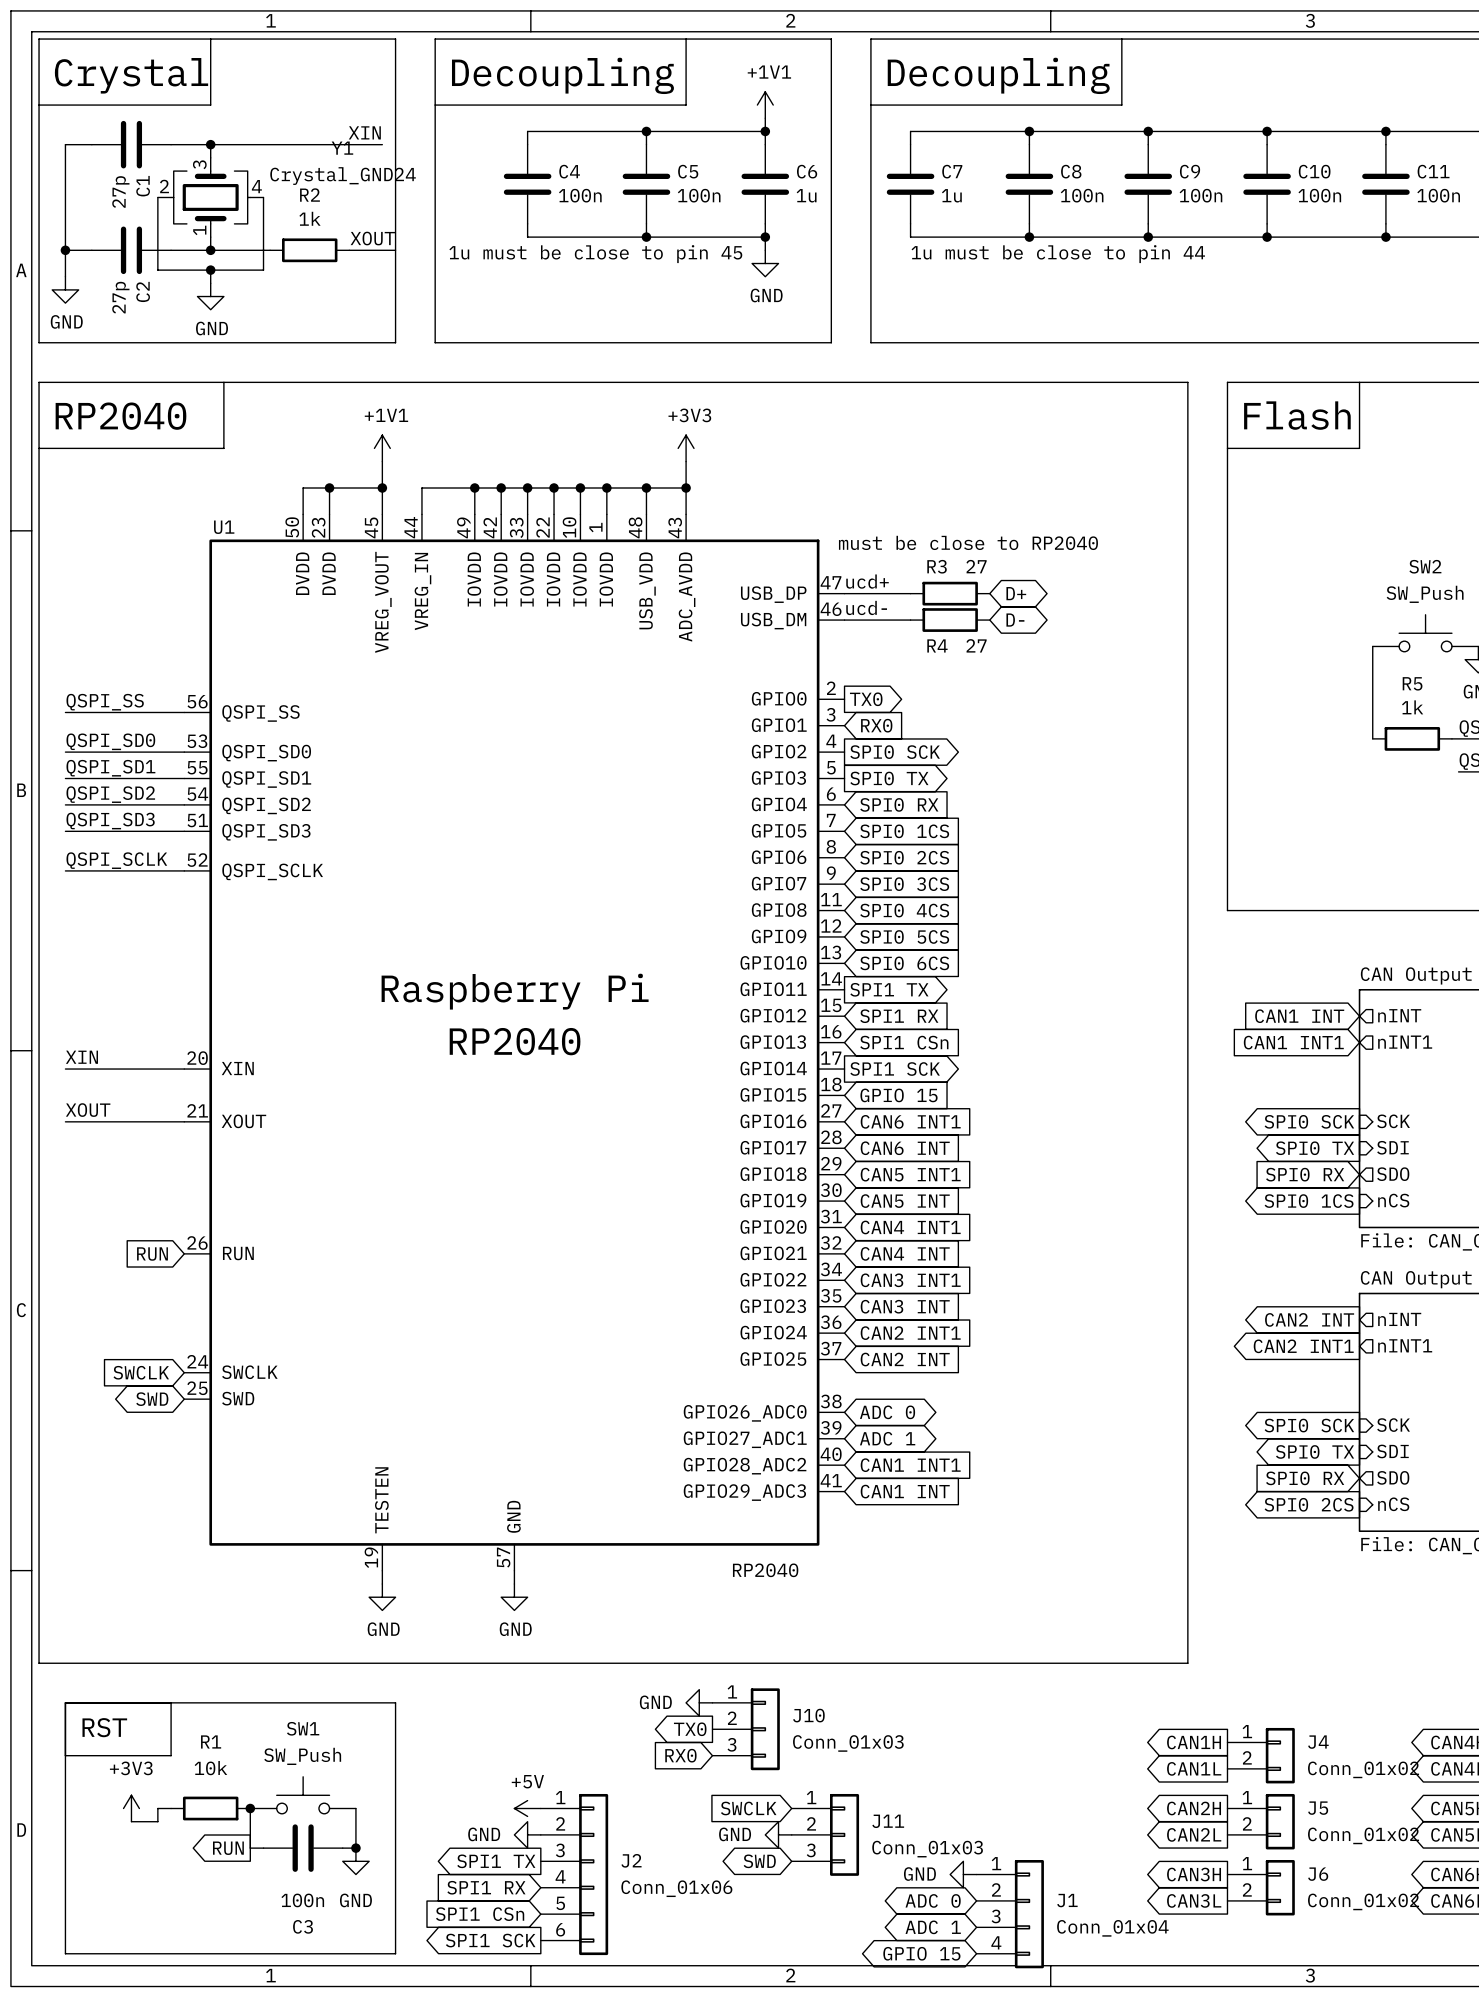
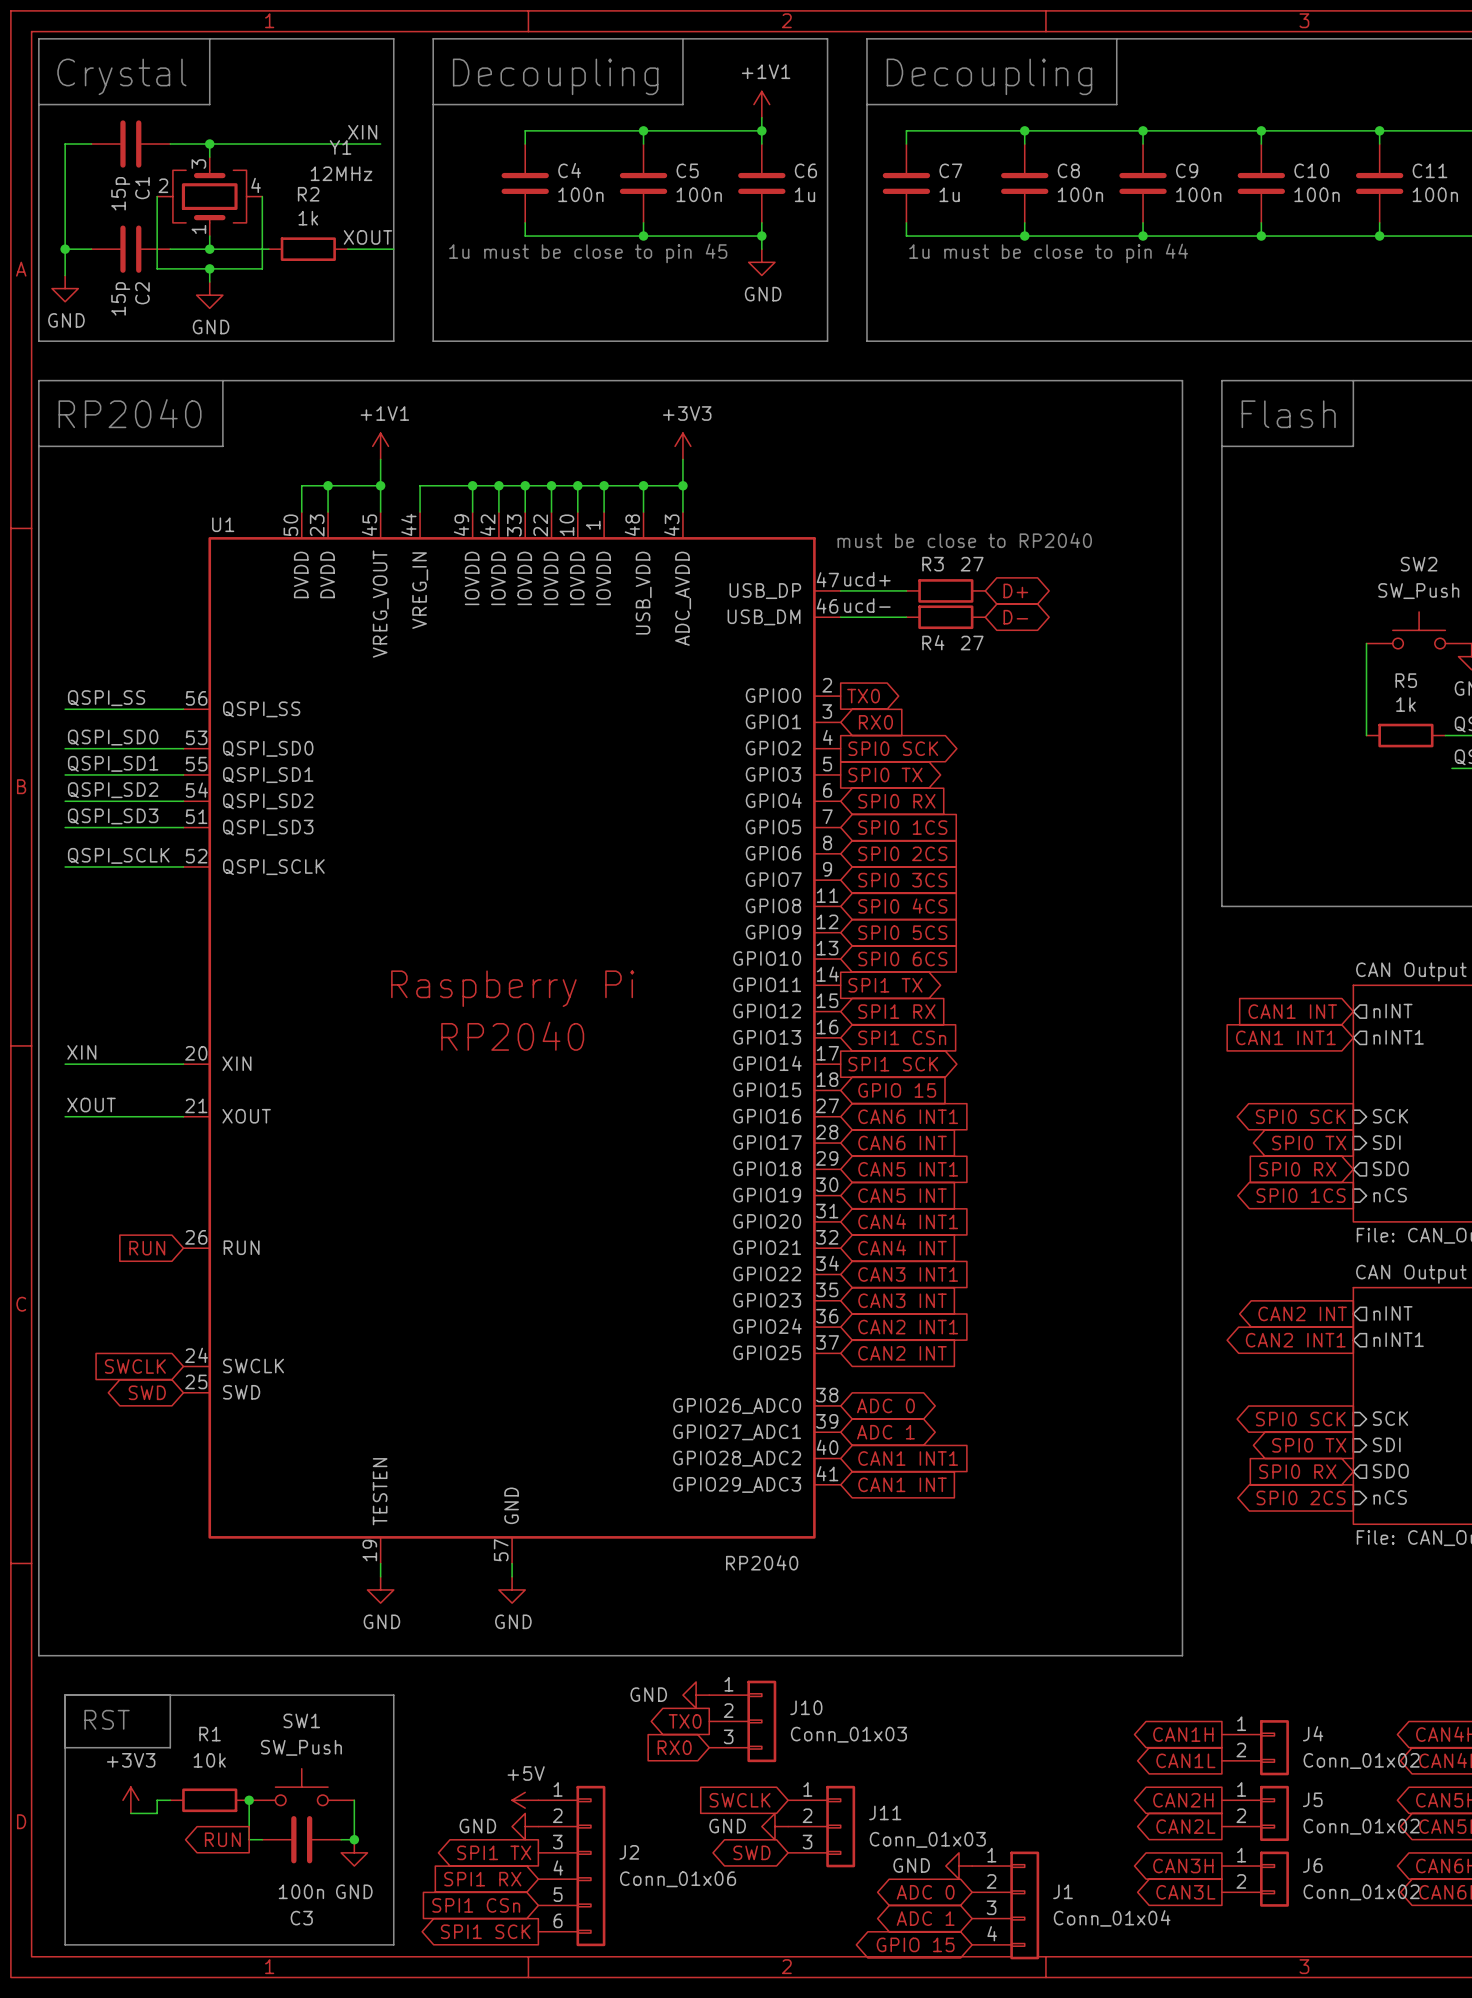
Y1 value: Crystal_GND24 (343, 176) -> 12MHz (341, 173)
C1 value: 27p (120, 192) -> 15p (120, 193)
C2 value: 27p (120, 297) -> 15p (120, 298)

